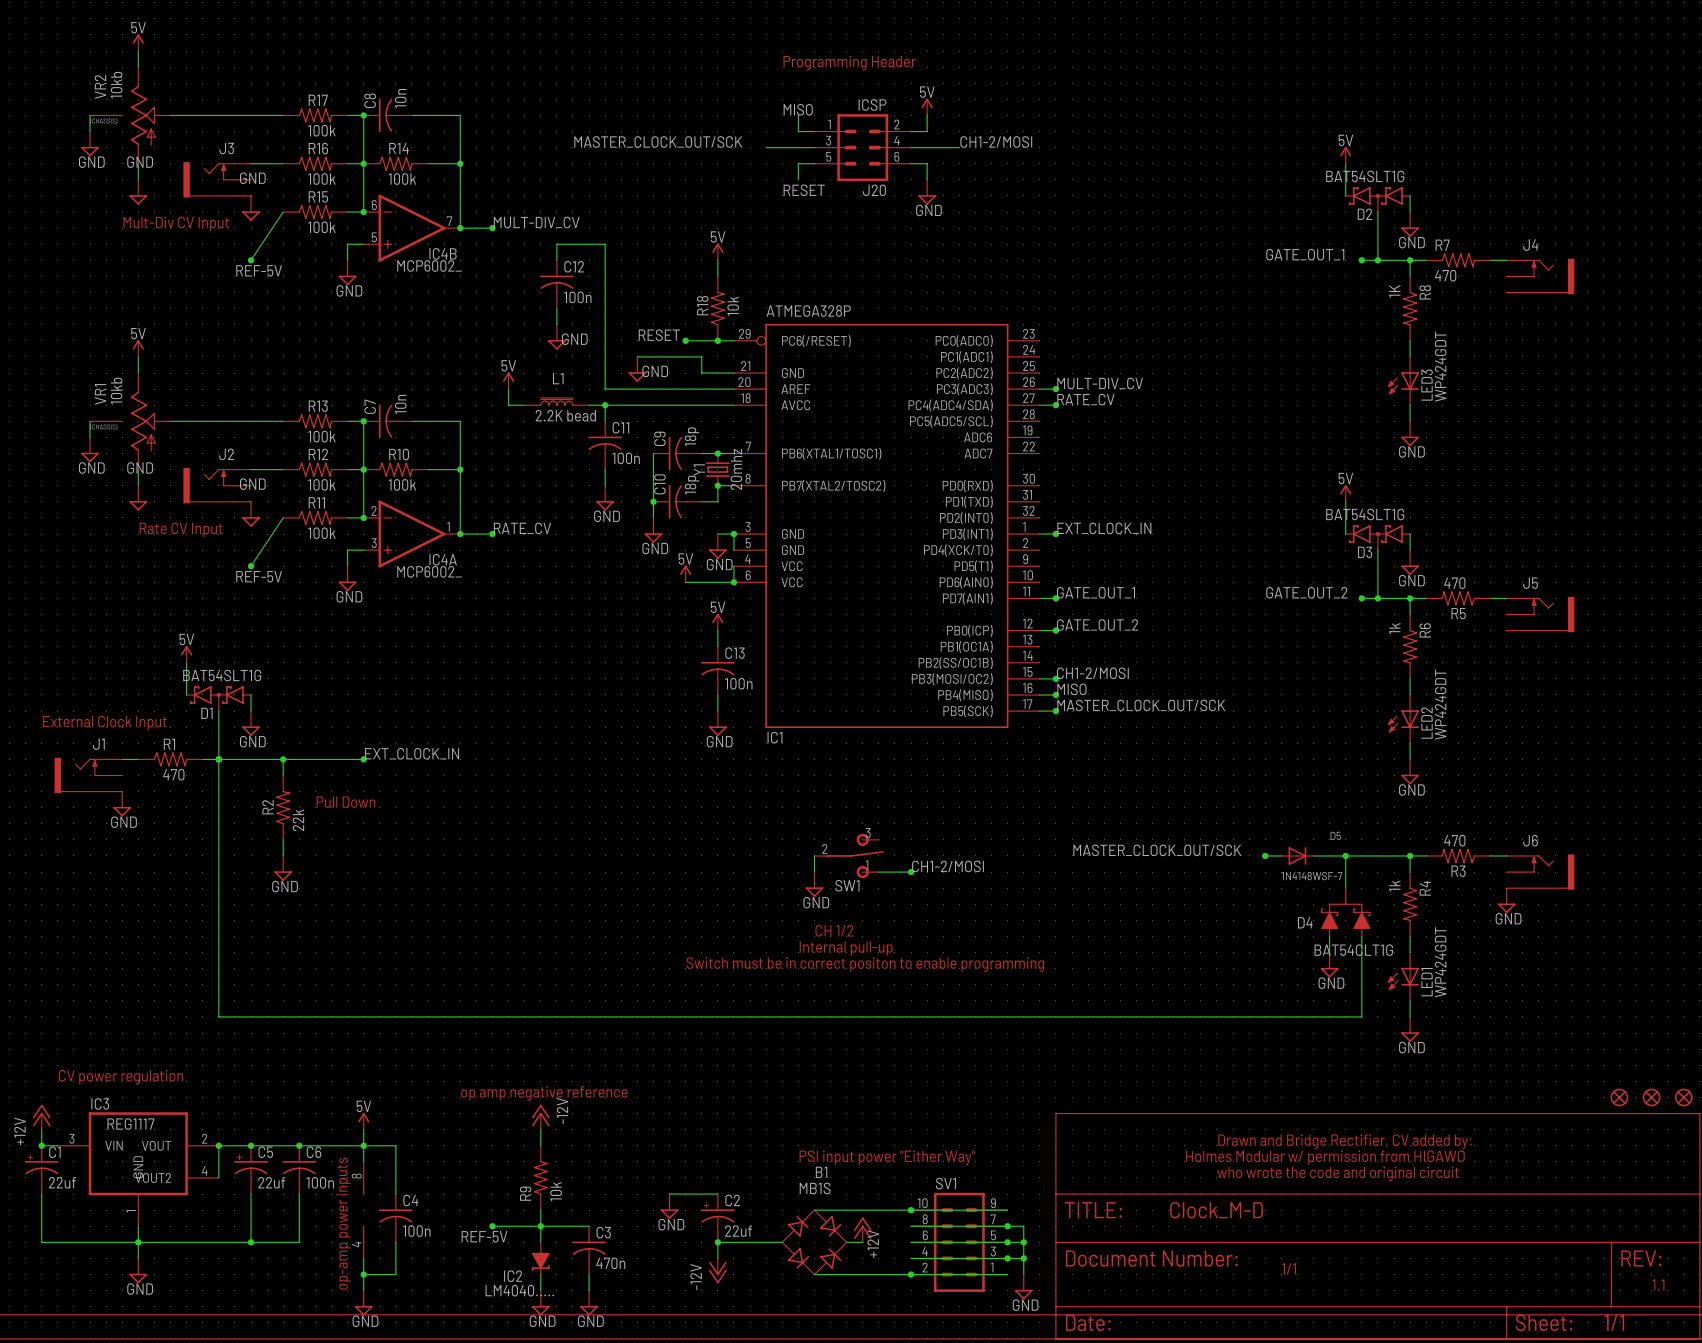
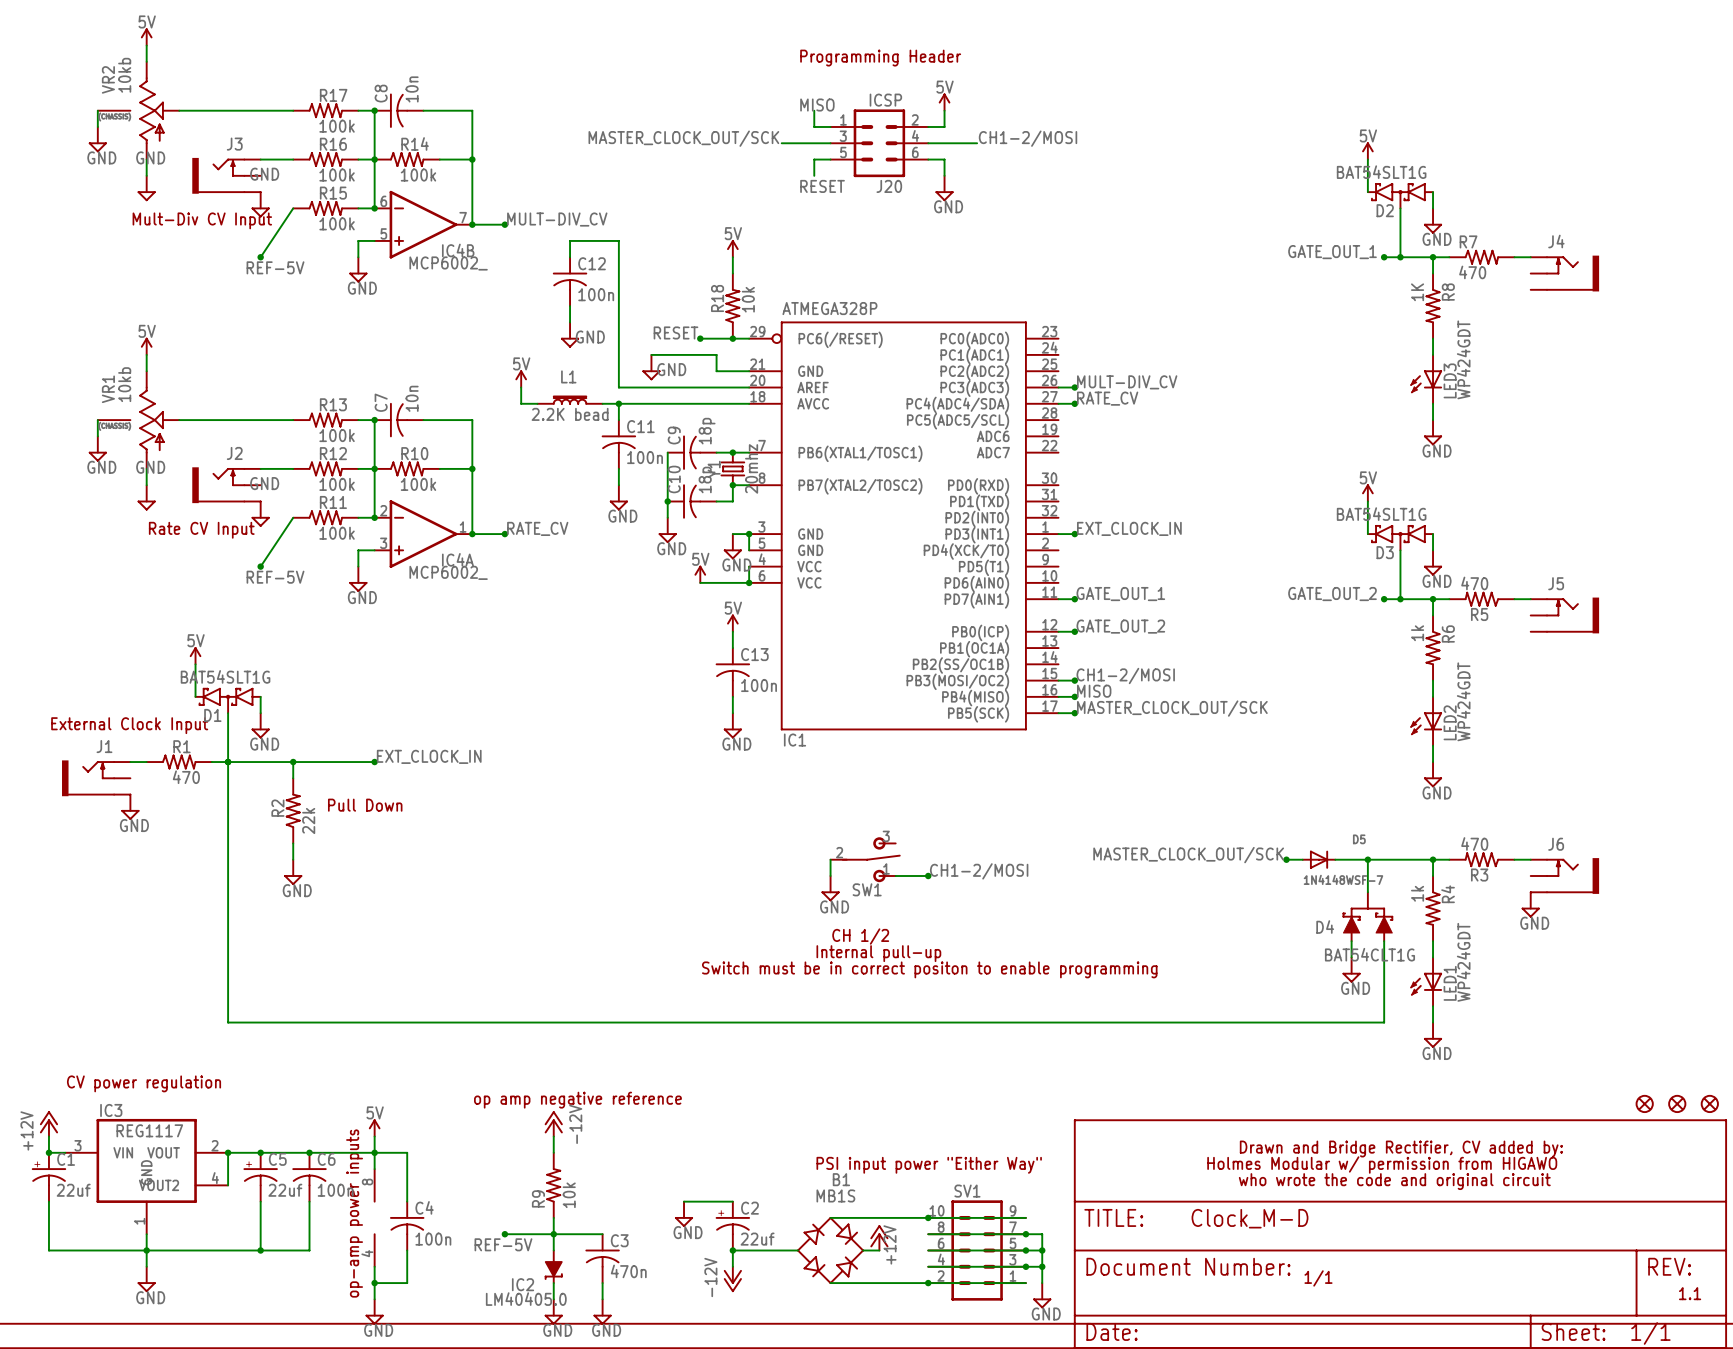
IC2 value: LM4040..... (519, 1290) -> LM40405.0 (526, 1299)

